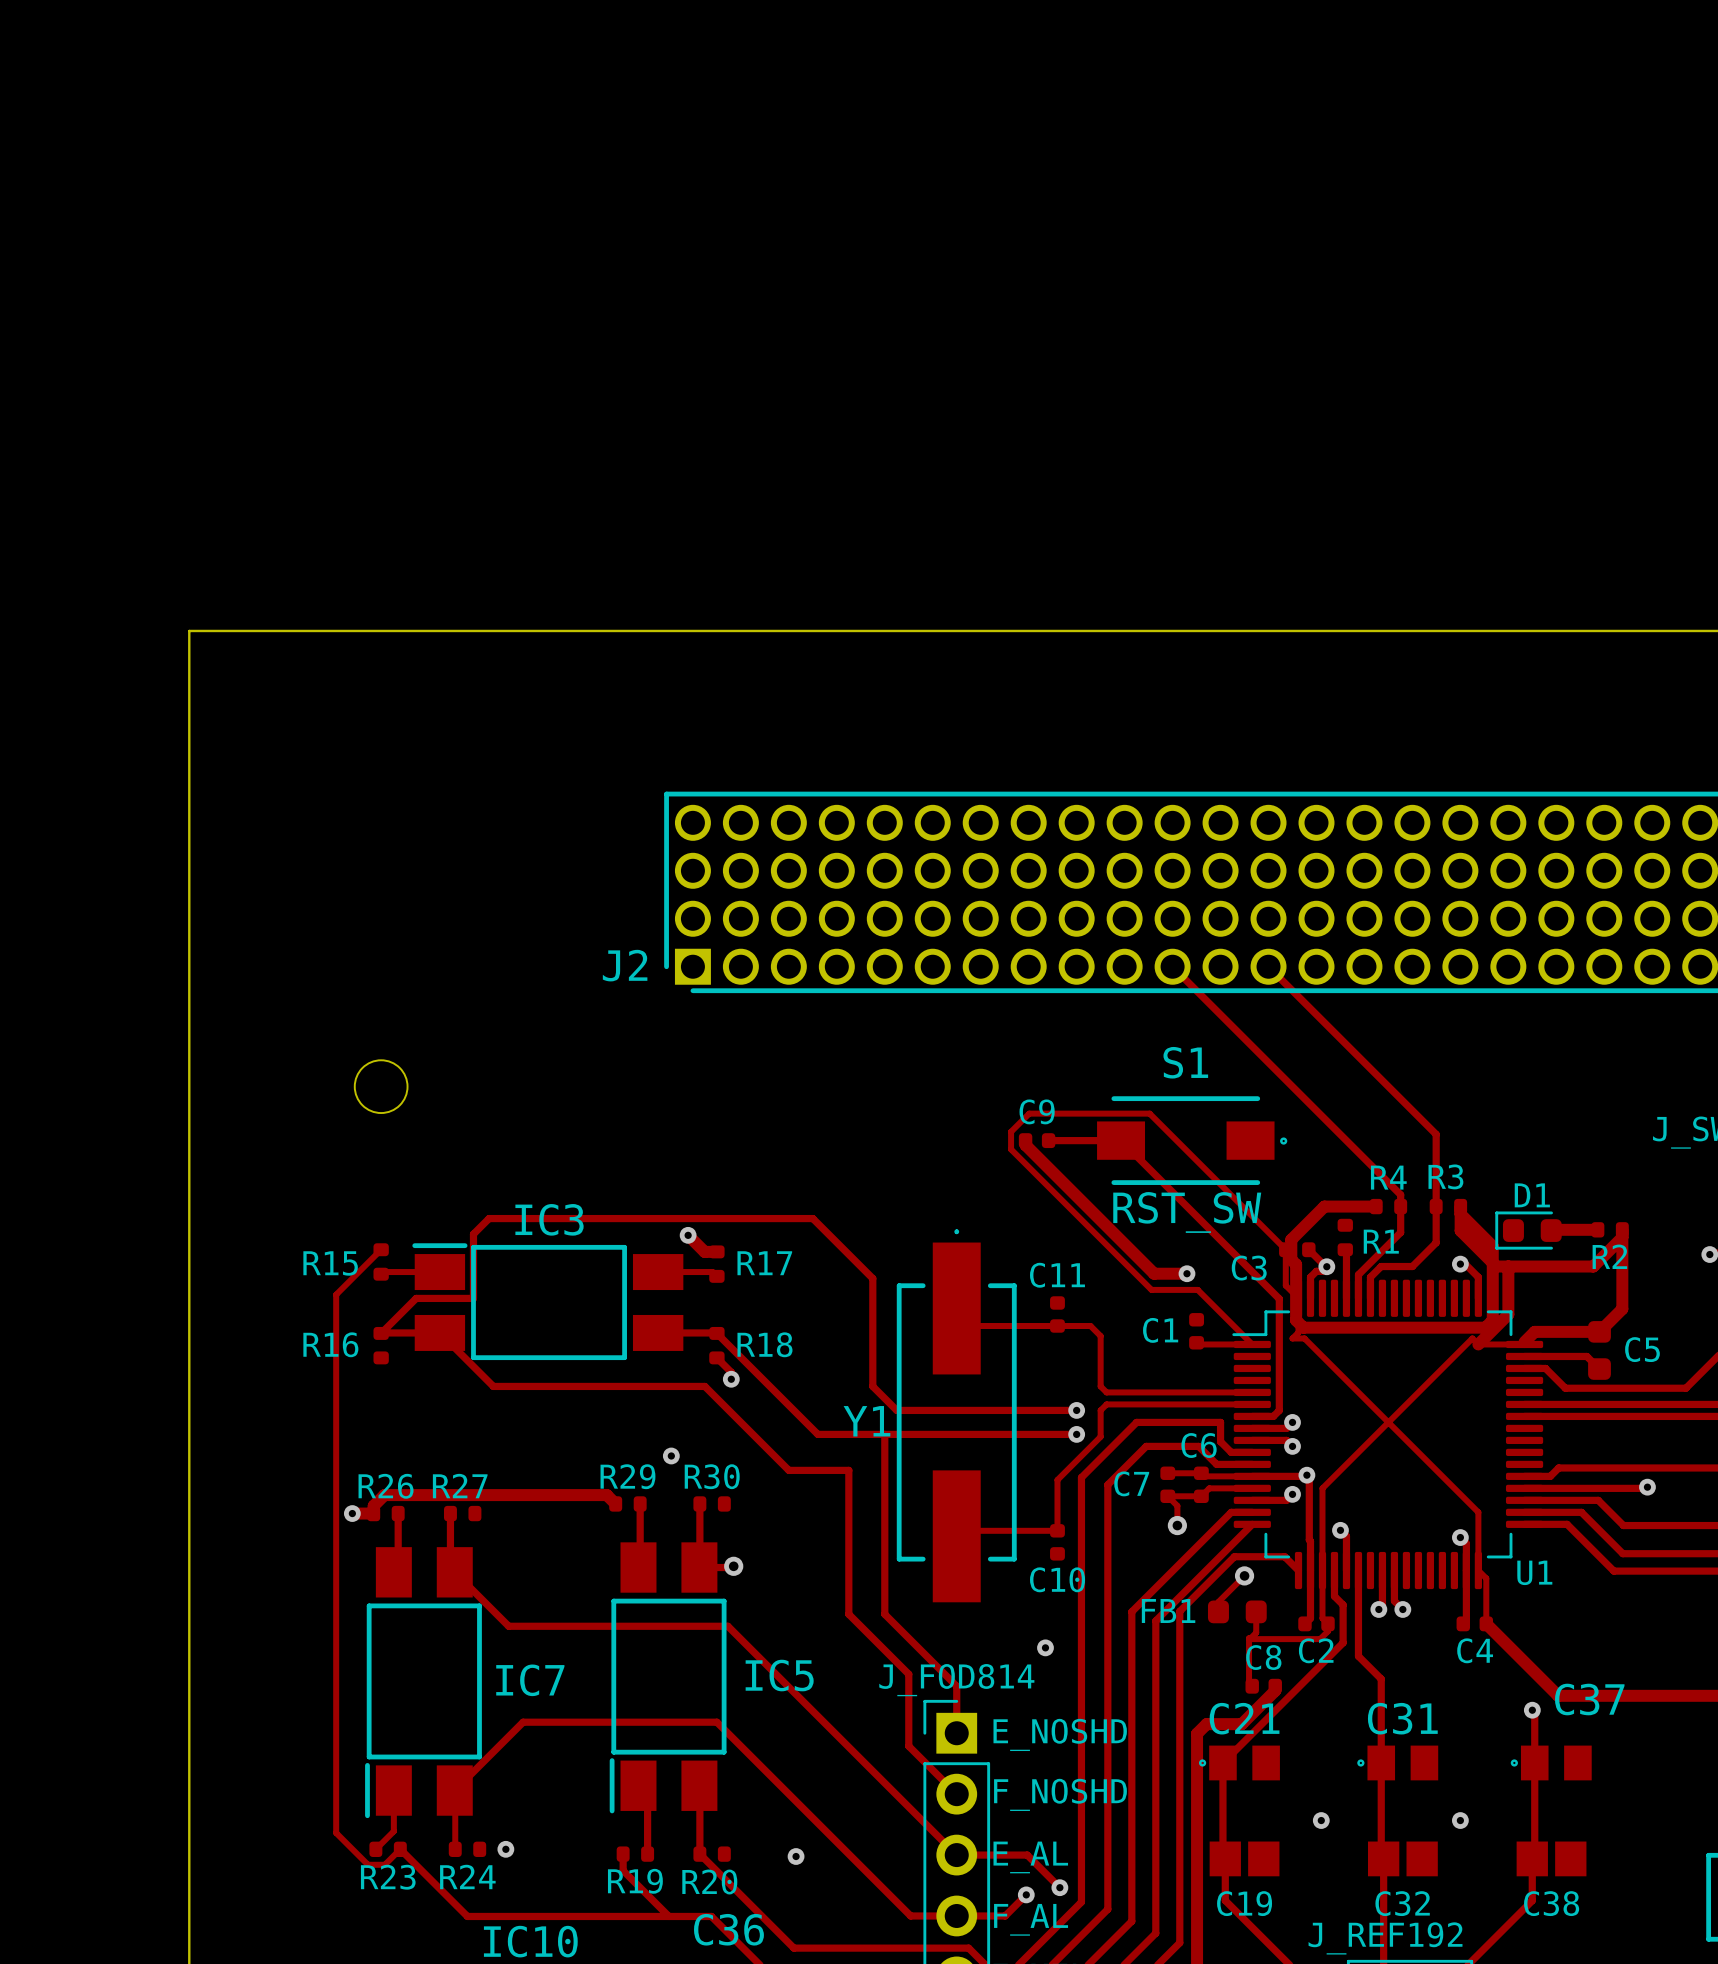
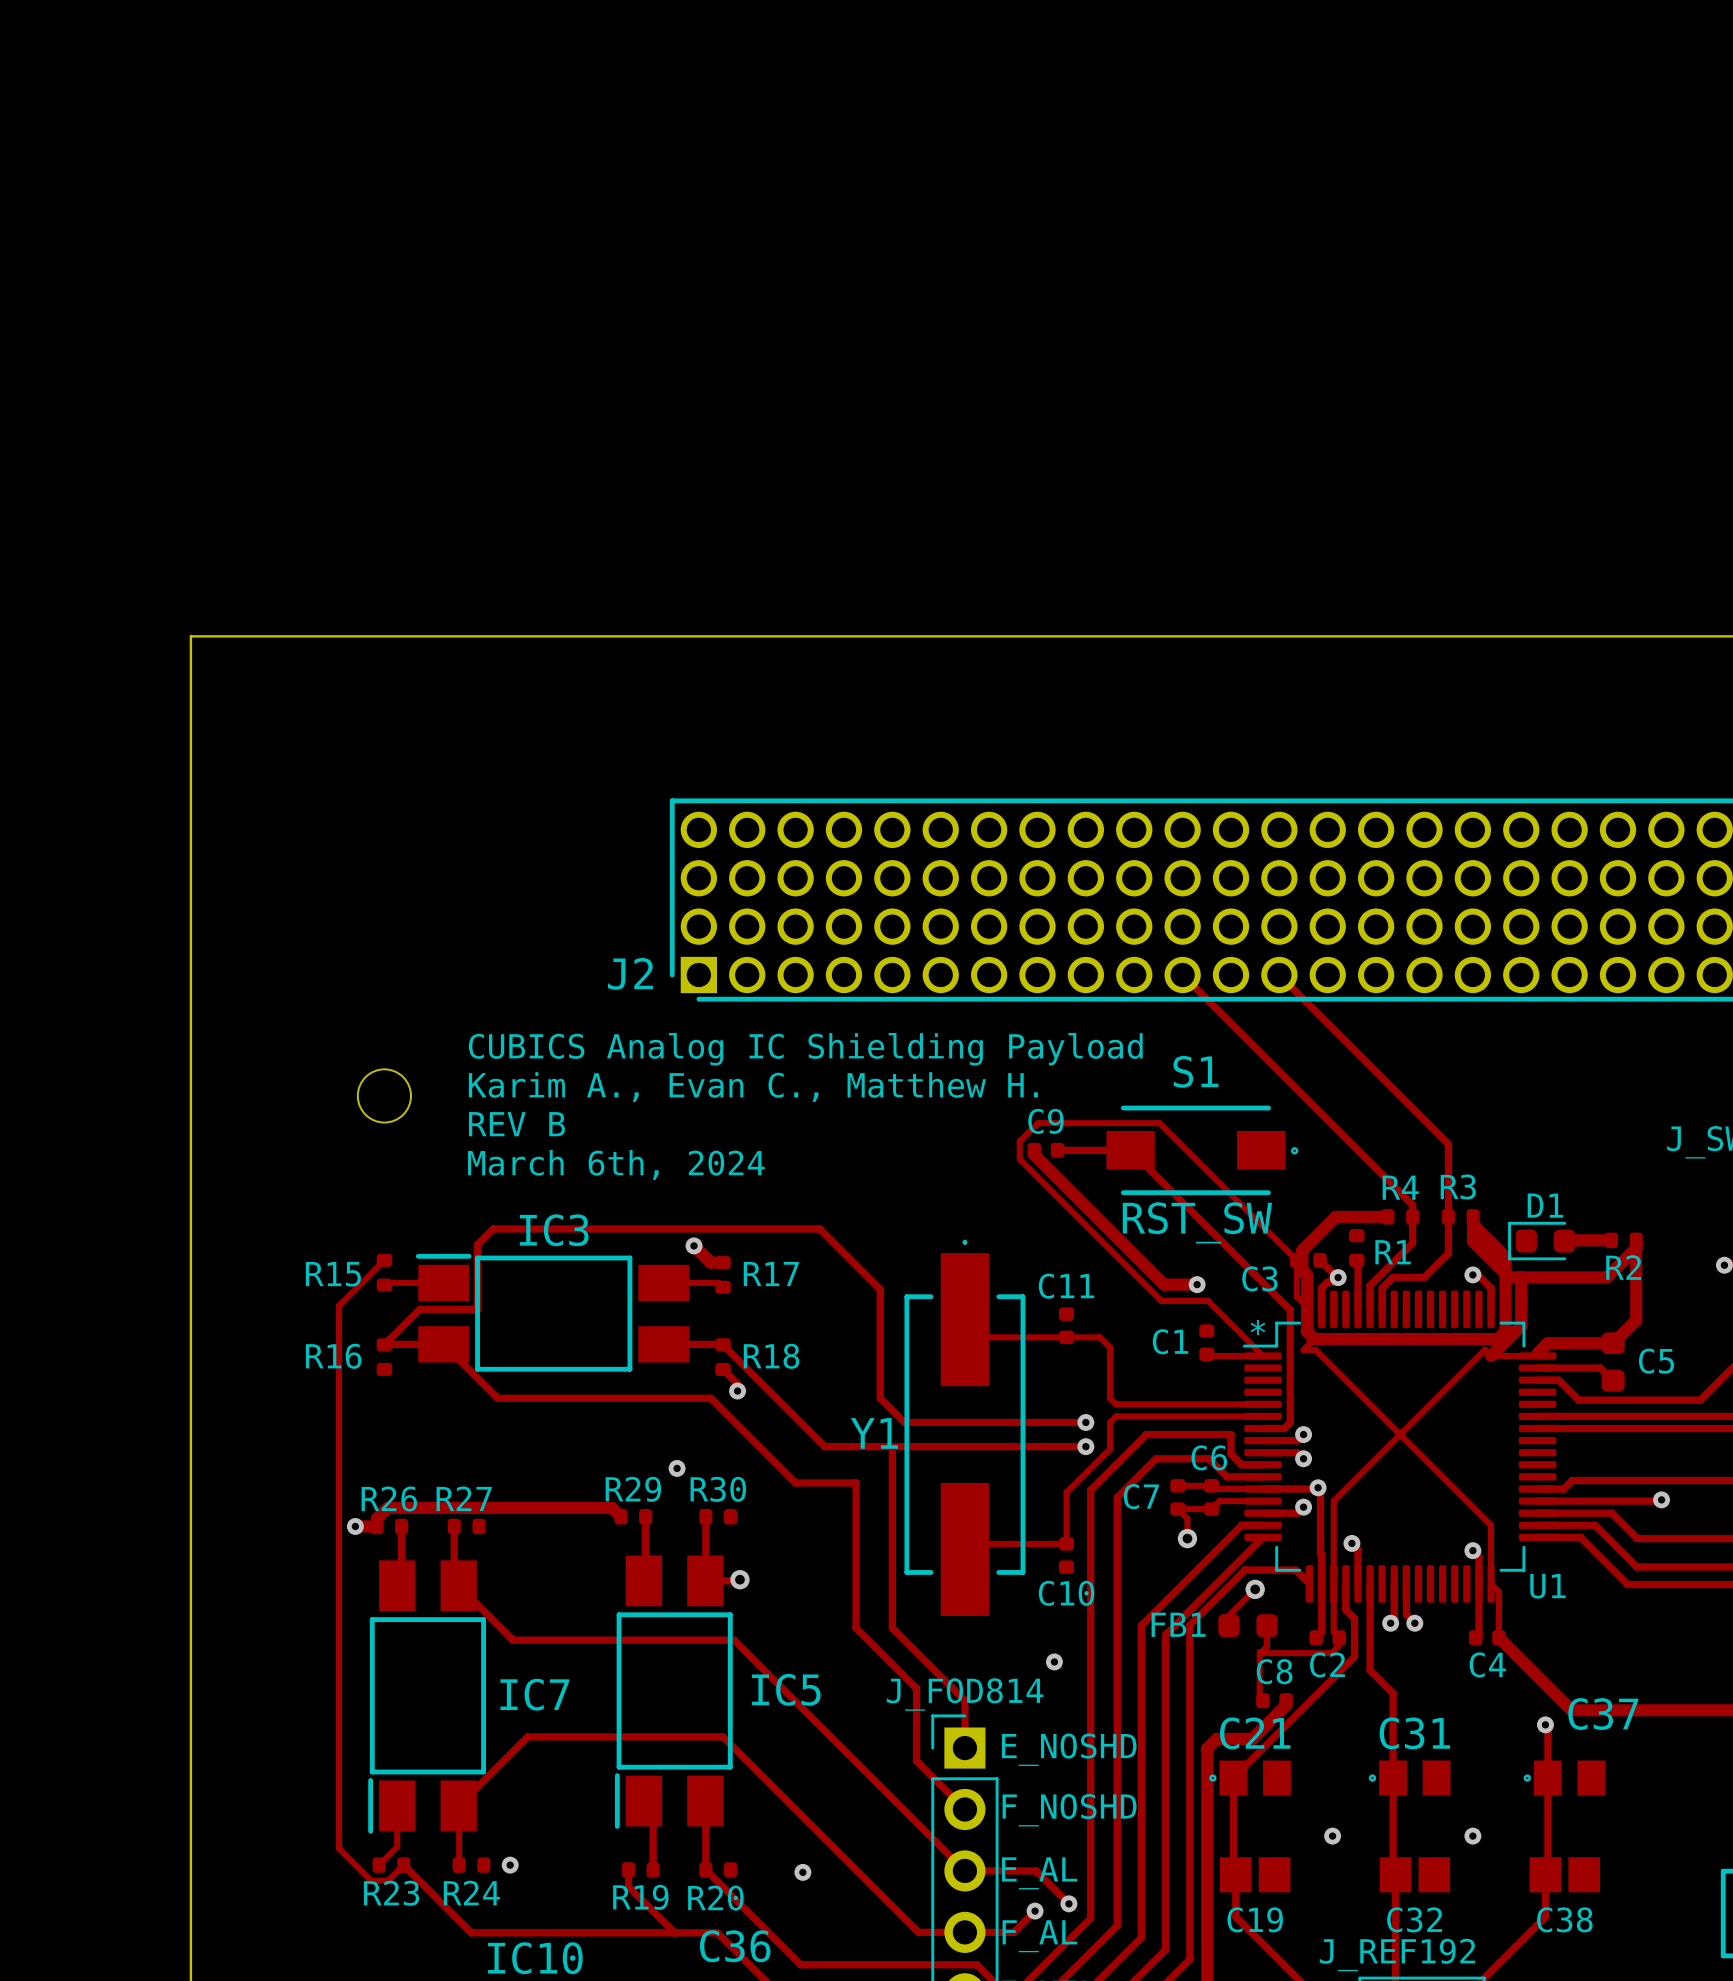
text: none -> CUBICS Analog IC Shielding Payload (805, 1049)
text: none -> Karim A., Evan C., Matthew H. (753, 1087)
text: none -> REV B (516, 1124)
text: none -> March 6th, 2024 (616, 1164)
text: none -> * (1257, 1327)

